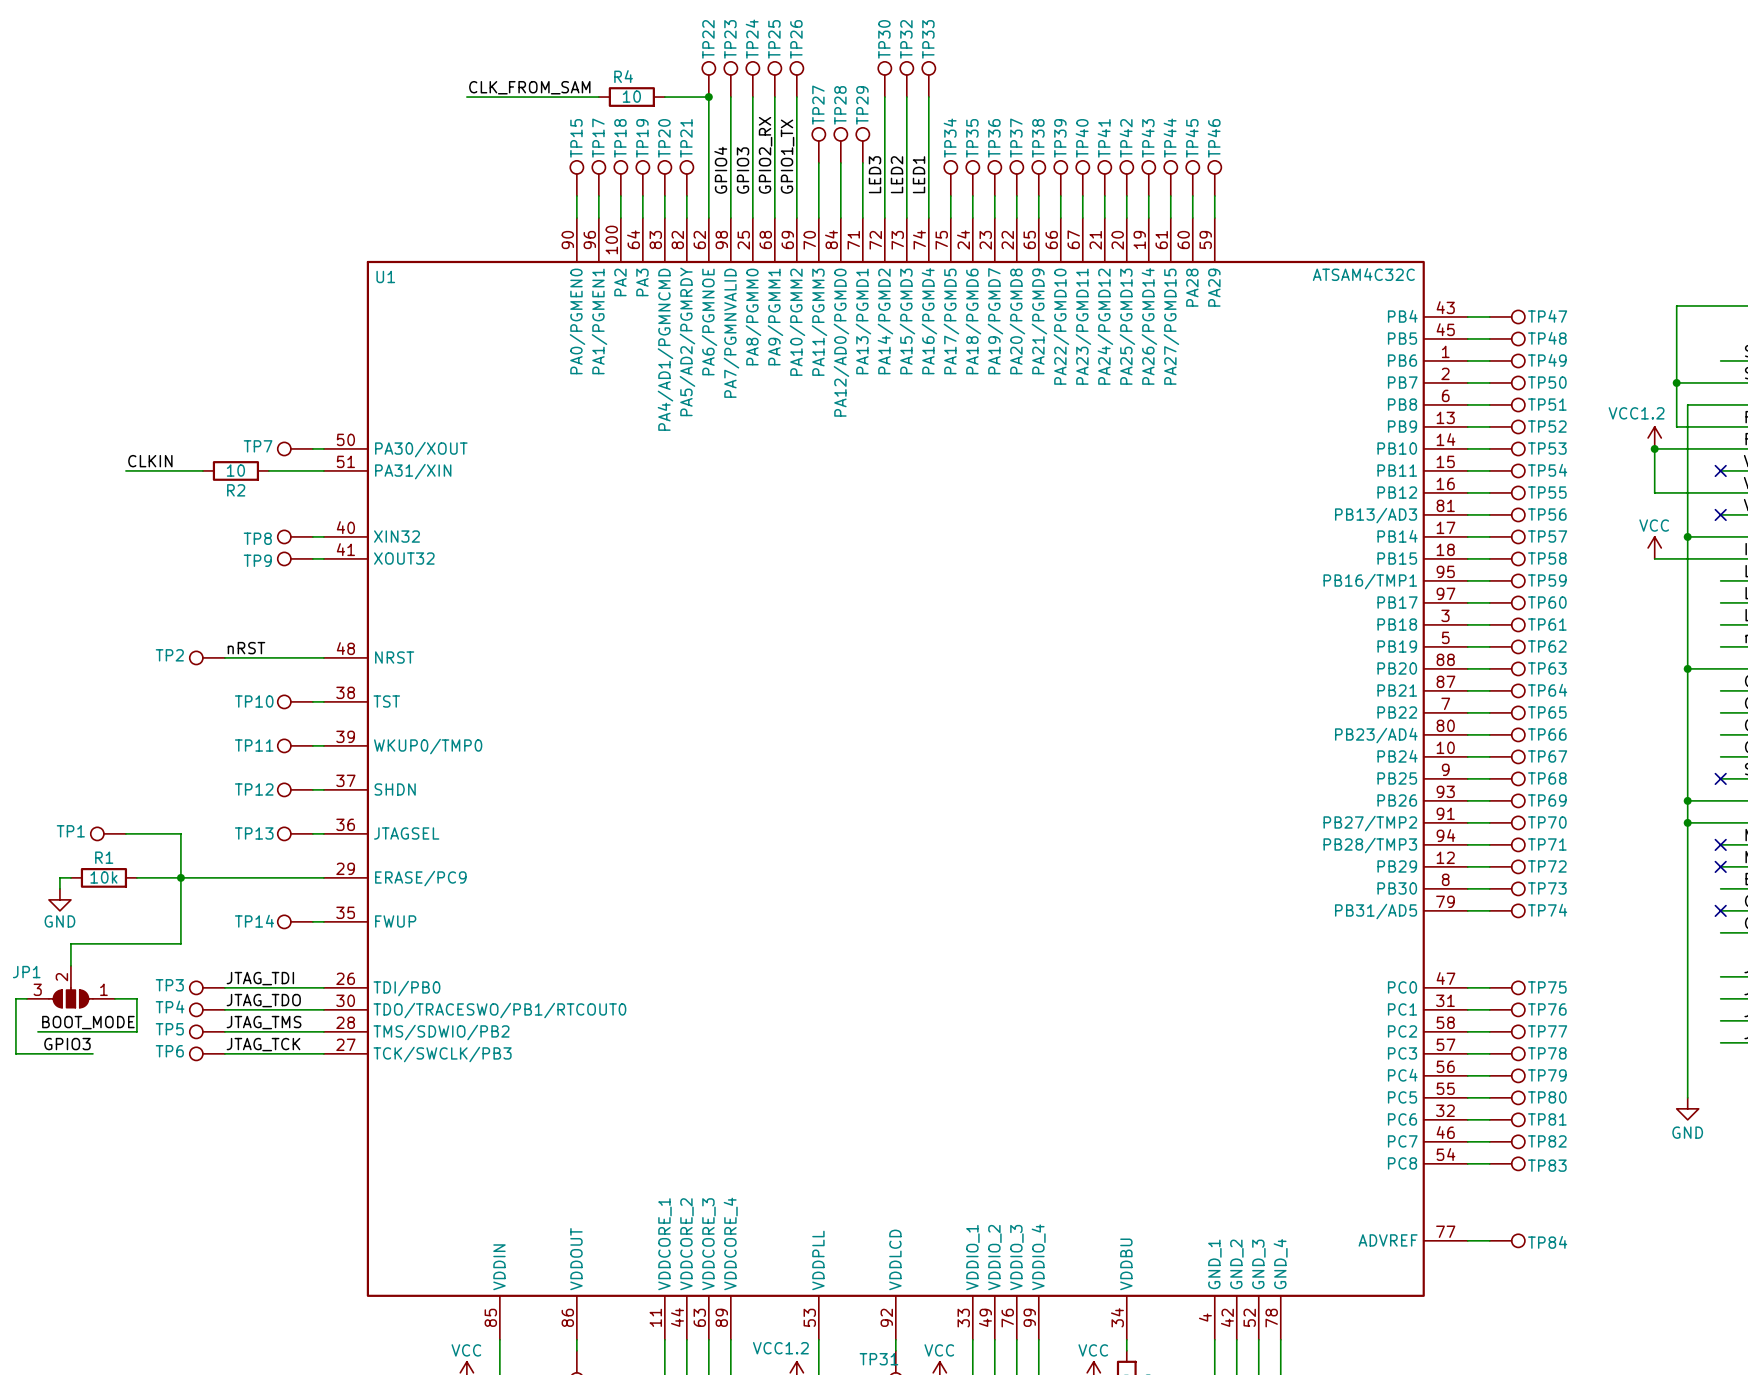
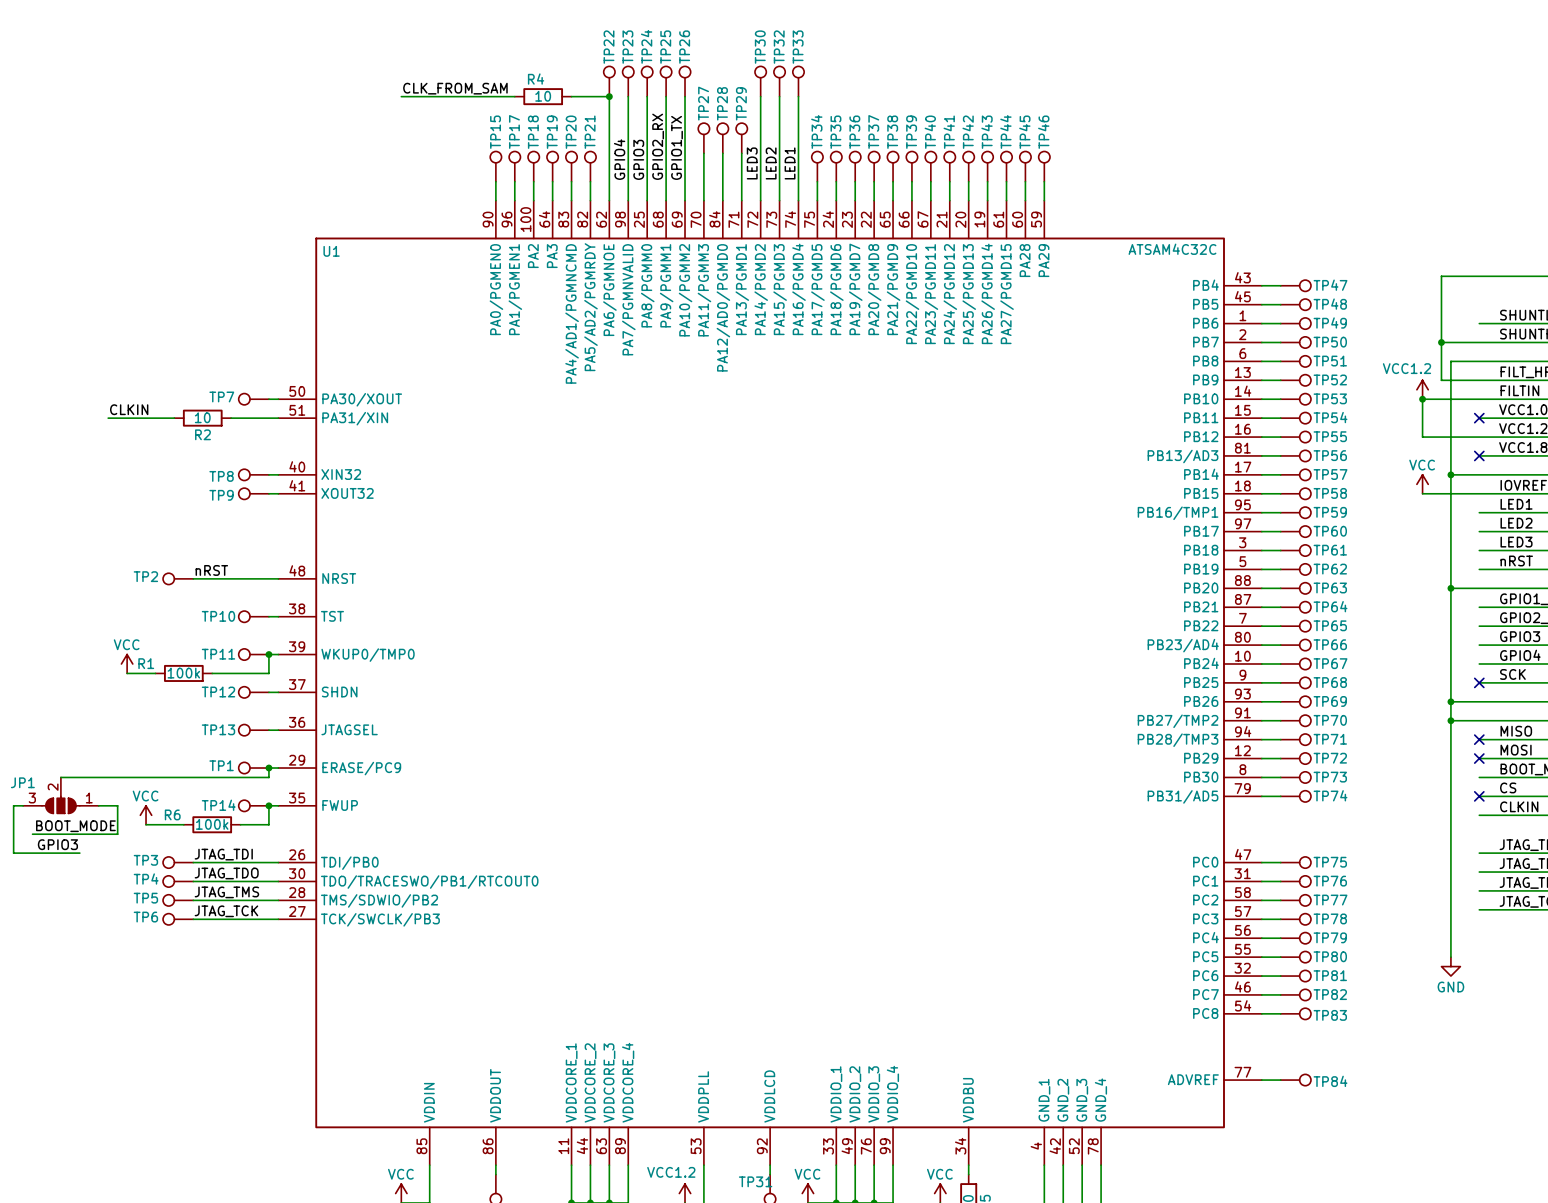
wire: none -> (268, 654) (268, 673) (212, 673)
junction: none -> (268, 654)
power symbol: none -> VCC (127, 663)
wire: none -> (127, 673) (155, 673)
TP1 position: (108, 833) -> (253, 768)
wire: (125, 833) (180, 833) (180, 943) -> (183, 824) (155, 824)
R1 name position: R1 (104, 857) -> R1 (146, 663)
wire: (70, 877) (59, 877) (59, 888) -> none
R1 position: (103, 877) -> (183, 673)
R1 value: 10k (103, 877) -> 100k (183, 673)
wire: (136, 877) (312, 877) -> (60, 777) (268, 777) (268, 768)
junction: (180, 877) -> none
junction: none -> (268, 768)
power symbol: GND (59, 899) -> none
wire: none -> (268, 805) (268, 824) (240, 824)
junction: none -> (268, 805)
power symbol: none -> VCC (146, 815)
wire: (169, 943) (70, 943) (70, 965) -> none
R6: none -> 100k (212, 824)
JP1 position: (70, 986) -> (60, 795)
wire: (26, 998) (15, 998) (15, 1053) (92, 1053) -> (23, 805) (13, 805) (13, 853) (79, 853)
wire: (114, 998) (136, 998) (136, 1031) (37, 1031) -> (98, 805) (117, 805) (117, 834) (32, 834)
label position: BOOT_MODE (88, 1022) -> BOOT_MODE (75, 826)
label position: GPIO3 (67, 1044) -> GPIO3 (57, 844)

